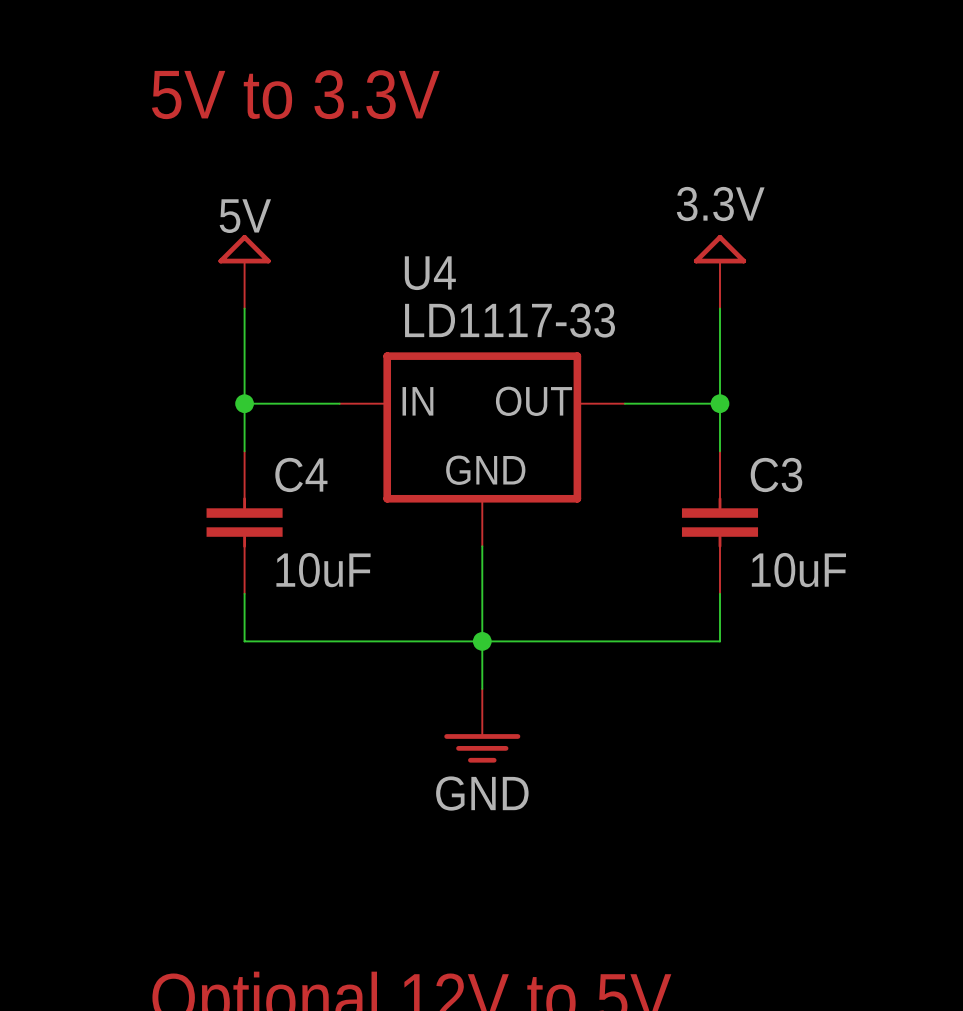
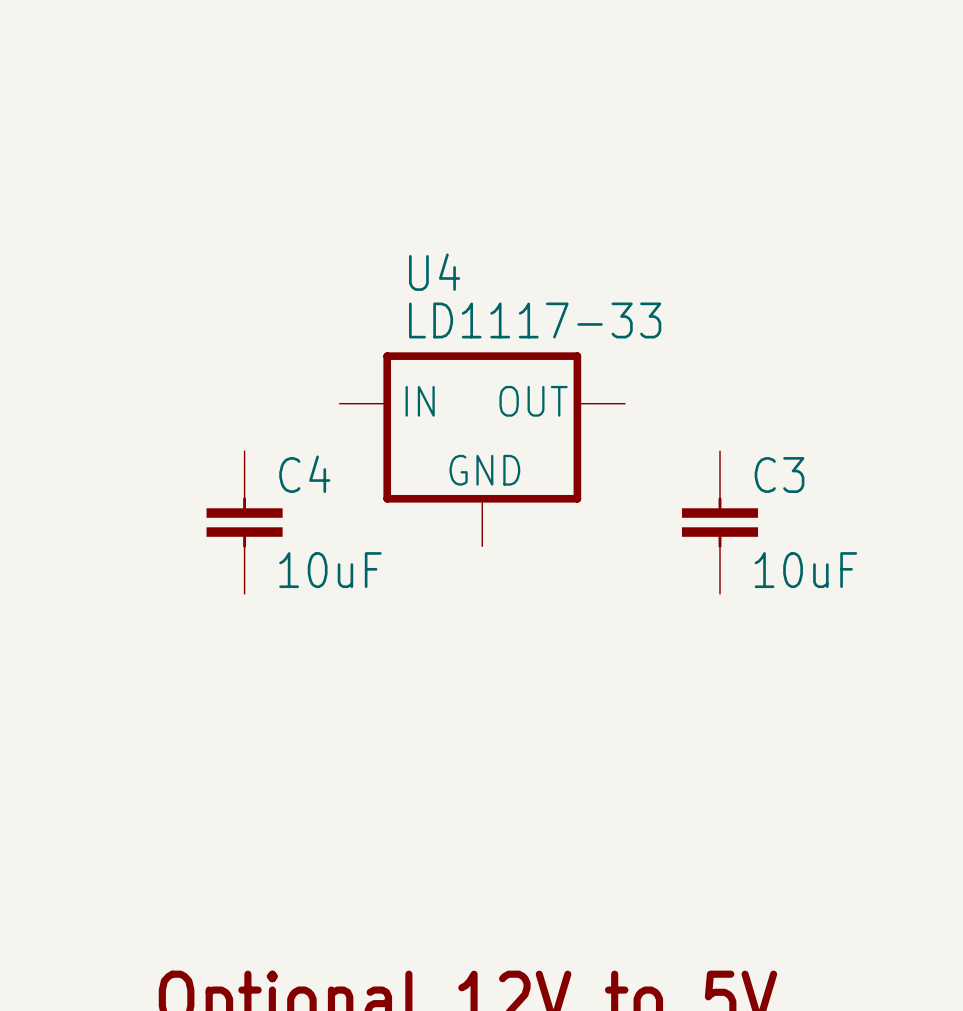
text: 5V to 3.3V (295, 94) -> none
power symbol: 5V (244, 271) -> none
power symbol: 3.3V (720, 271) -> none
wire: (244, 308) (244, 451) -> none
wire: (720, 308) (720, 451) -> none
wire: (244, 403) (339, 403) -> none
junction: (244, 403) -> none
wire: (624, 403) (720, 403) -> none
junction: (720, 403) -> none
wire: (482, 546) (482, 688) -> none
wire: (244, 593) (244, 641) (720, 641) (720, 593) -> none
junction: (482, 641) -> none
power symbol: GND (482, 725) -> none

